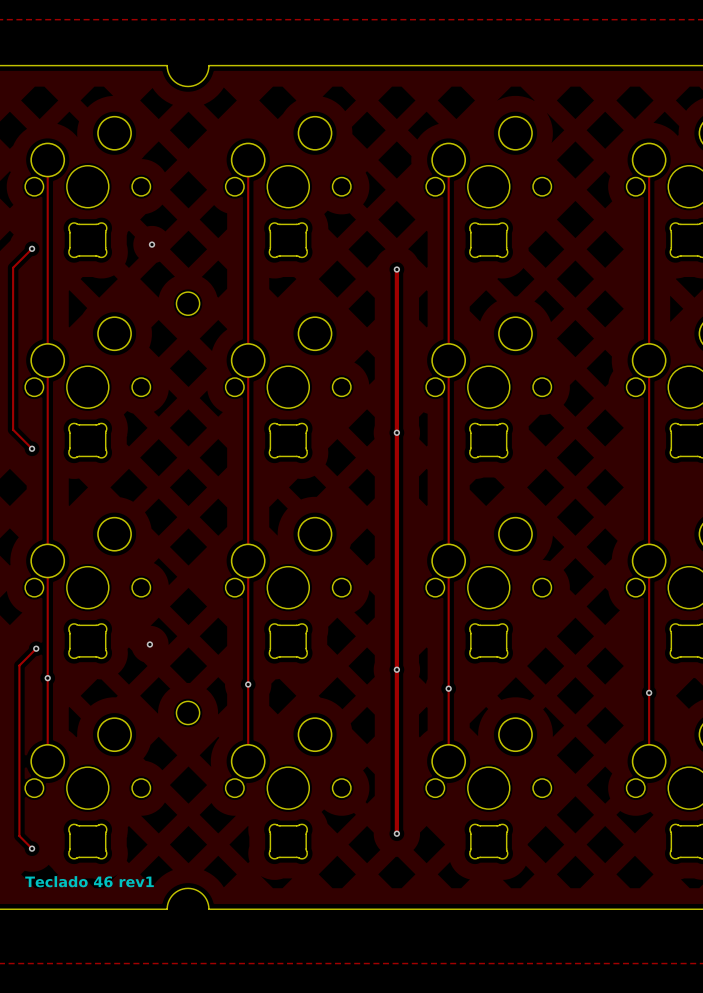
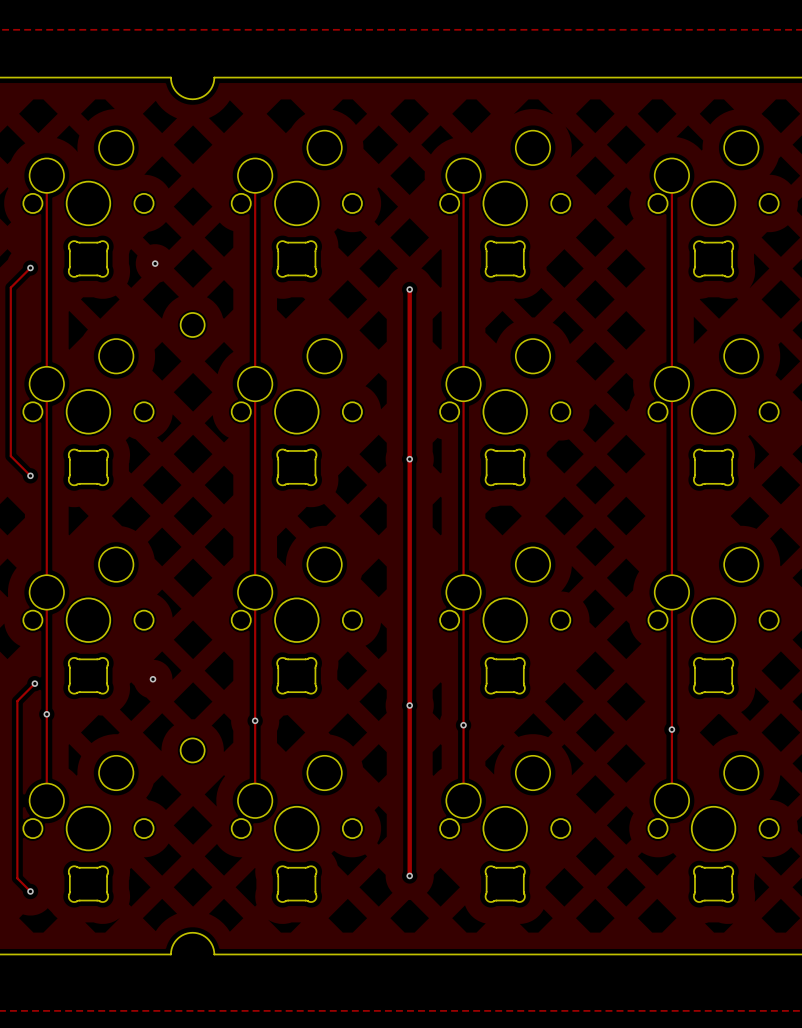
text: Teclado 46 rev1 (89, 881) -> none

